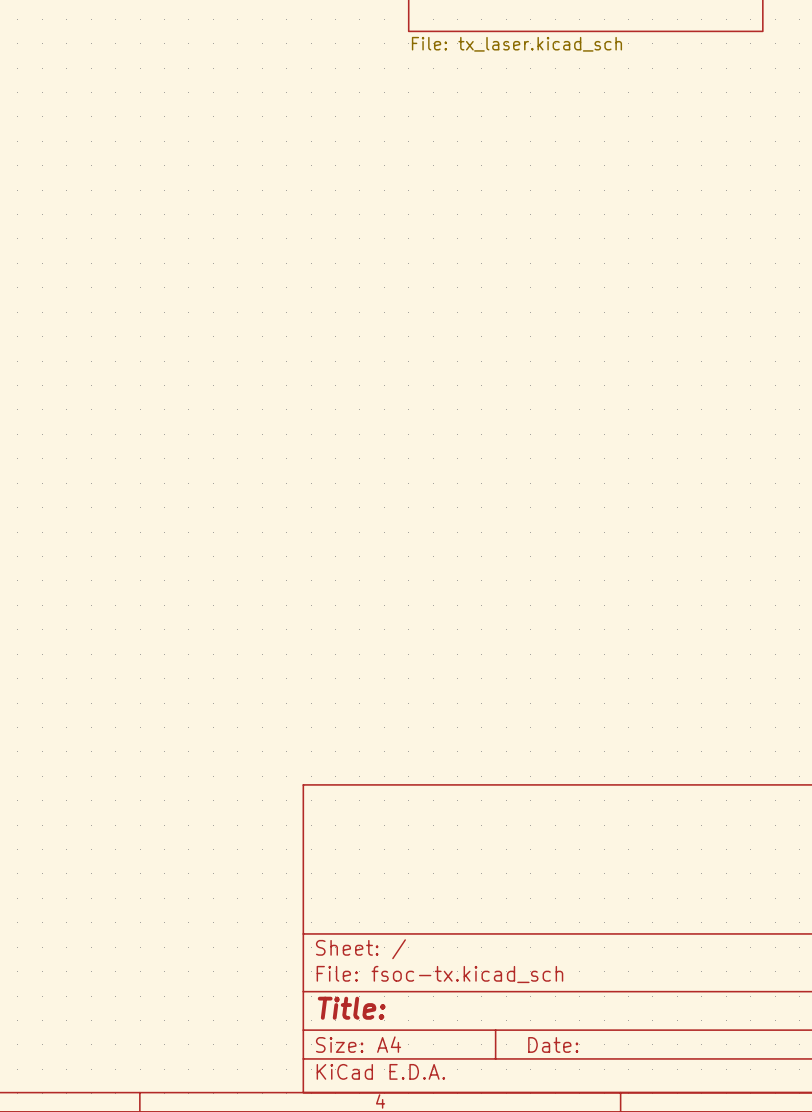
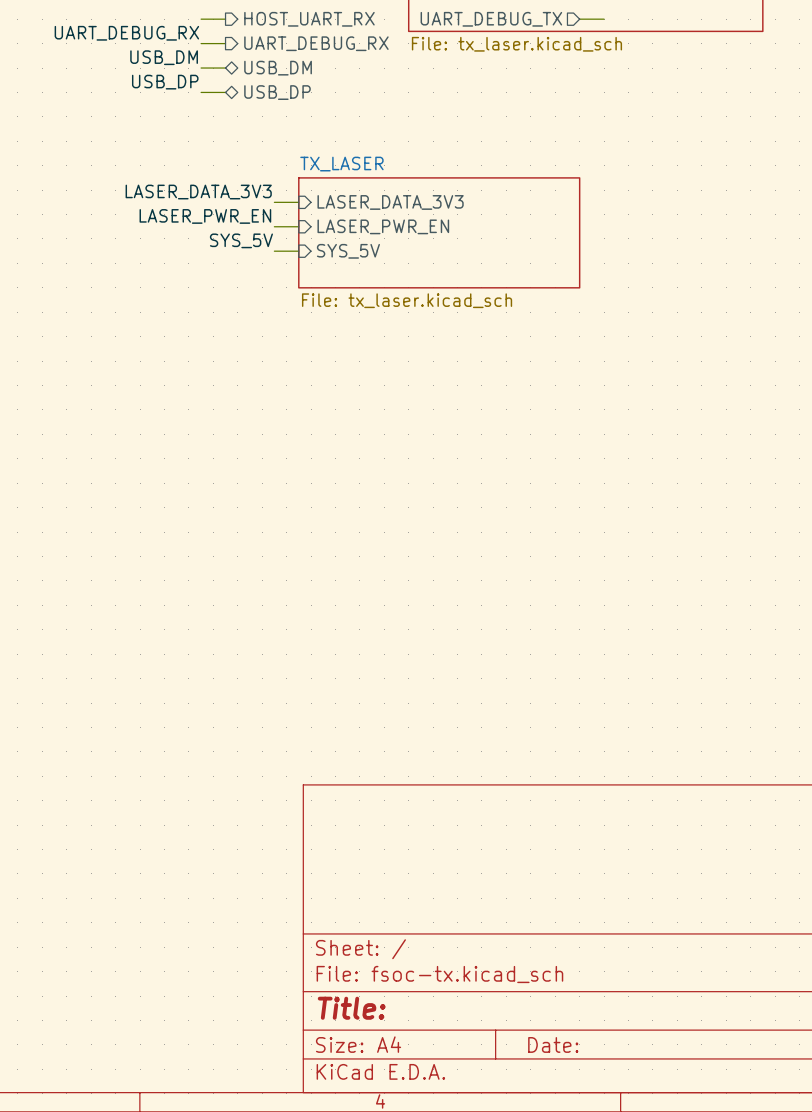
wire: none -> (201, 19) (225, 19)
sheet pin: none -> HOST_UART_RX (309, 19)
sheet pin: none -> UART_DEBUG_TX (491, 19)
wire: none -> (579, 19) (604, 19)
label: none -> UART_DEBUG_RX (126, 33)
wire: none -> (201, 43) (225, 43)
sheet pin: none -> UART_DEBUG_RX (316, 43)
label: none -> USB_DM (164, 57)
wire: none -> (201, 68) (225, 68)
sheet pin: none -> USB_DM (278, 68)
label: none -> USB_DP (165, 82)
wire: none -> (201, 92) (225, 92)
sheet pin: none -> USB_DP (277, 92)
label: none -> LASER_DATA_3V3 (198, 192)
wire: none -> (274, 202) (298, 202)
sheet pin: none -> LASER_DATA_3V3 (390, 202)
label: none -> LASER_PWR_EN (205, 216)
wire: none -> (274, 226) (298, 226)
sheet pin: none -> LASER_PWR_EN (383, 226)
sheet TX_LASER: none -> File: tx_laser.kicad_sch (439, 232)
label: none -> SYS_5V (241, 240)
wire: none -> (274, 251) (298, 251)
sheet pin: none -> SYS_5V (348, 251)

